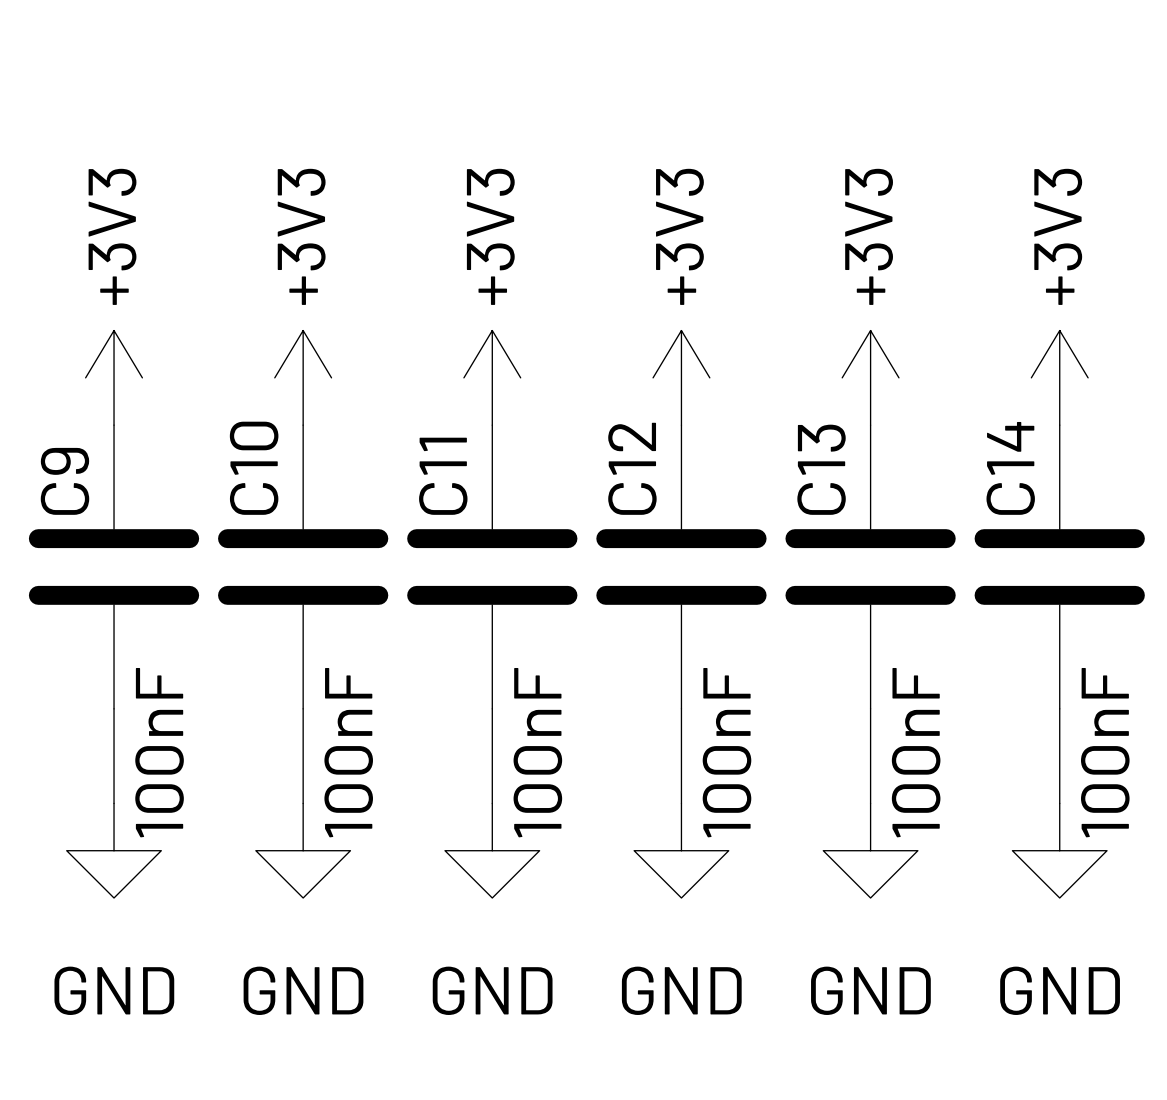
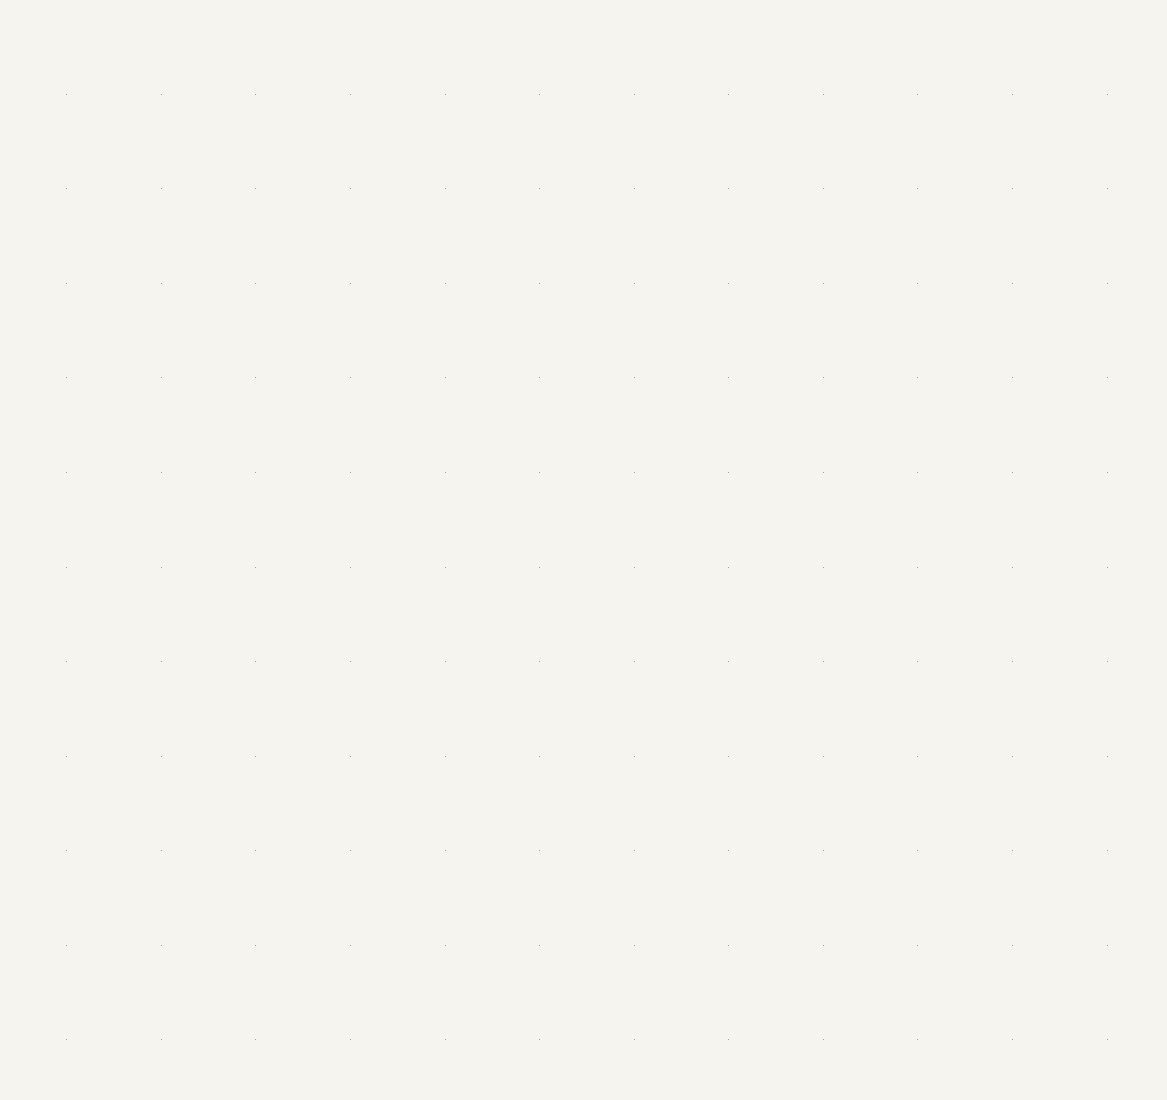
power symbol: +3V3 (114, 377) -> none
power symbol: +3V3 (303, 377) -> none
power symbol: +3V3 (492, 377) -> none
power symbol: +3V3 (681, 377) -> none
power symbol: +3V3 (870, 377) -> none
power symbol: +3V3 (1059, 377) -> none
C9: 100nF (114, 567) -> none
C10: 100nF (303, 567) -> none
C11: 100nF (492, 567) -> none
C12: 100nF (681, 567) -> none
C13: 100nF (870, 567) -> none
C14: 100nF (1059, 567) -> none
wire: (114, 708) (114, 803) -> none
wire: (303, 708) (303, 803) -> none
wire: (492, 708) (492, 803) -> none
wire: (681, 708) (681, 803) -> none
wire: (870, 708) (870, 803) -> none
wire: (1059, 708) (1059, 803) -> none
power symbol: GND (114, 850) -> none
power symbol: GND (303, 850) -> none
power symbol: GND (492, 850) -> none
power symbol: GND (681, 850) -> none
power symbol: GND (870, 850) -> none
power symbol: GND (1059, 850) -> none

